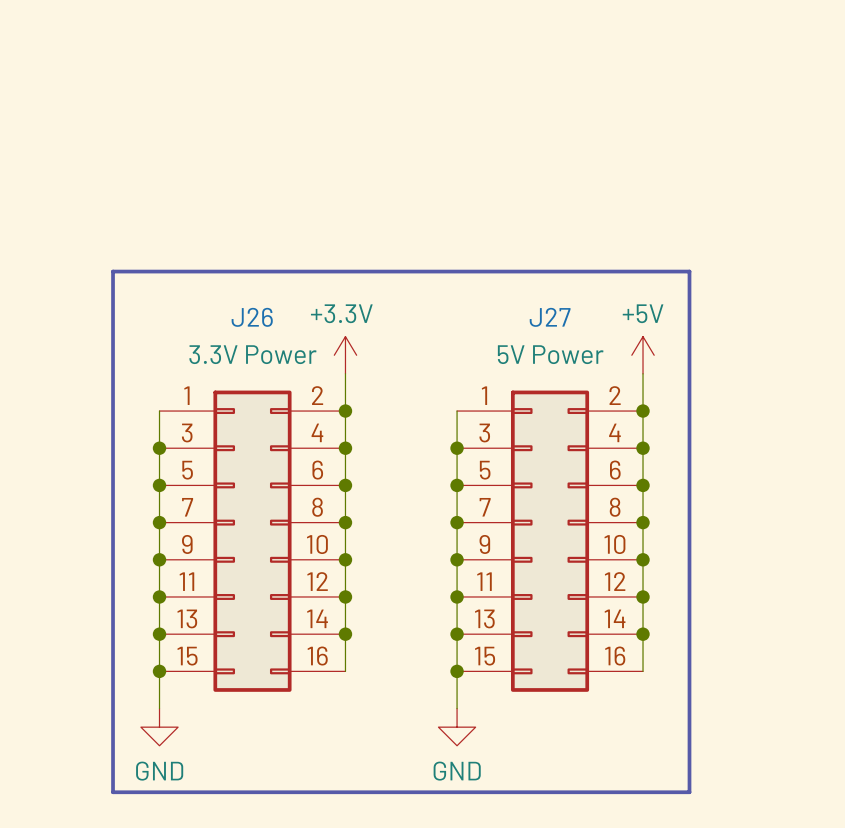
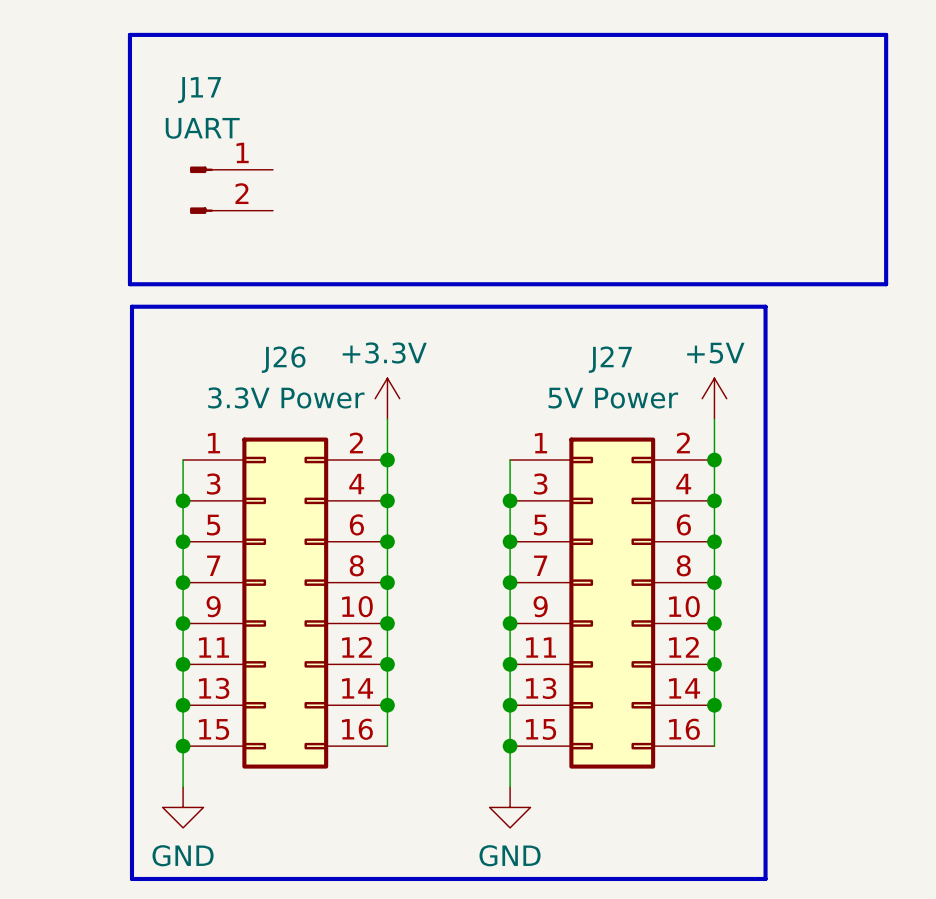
line: none -> (129, 34) (886, 34) (886, 284) (129, 284) (129, 34)
J17: none -> UART (231, 190)

